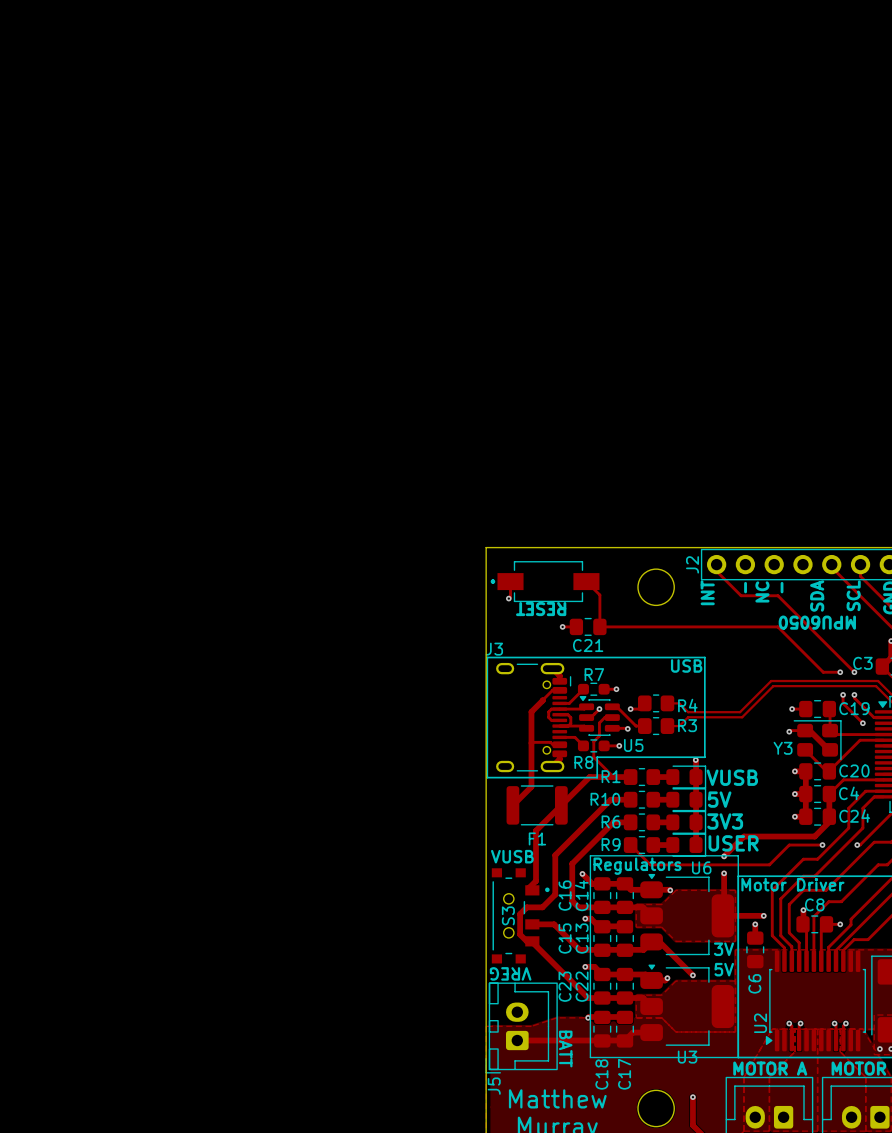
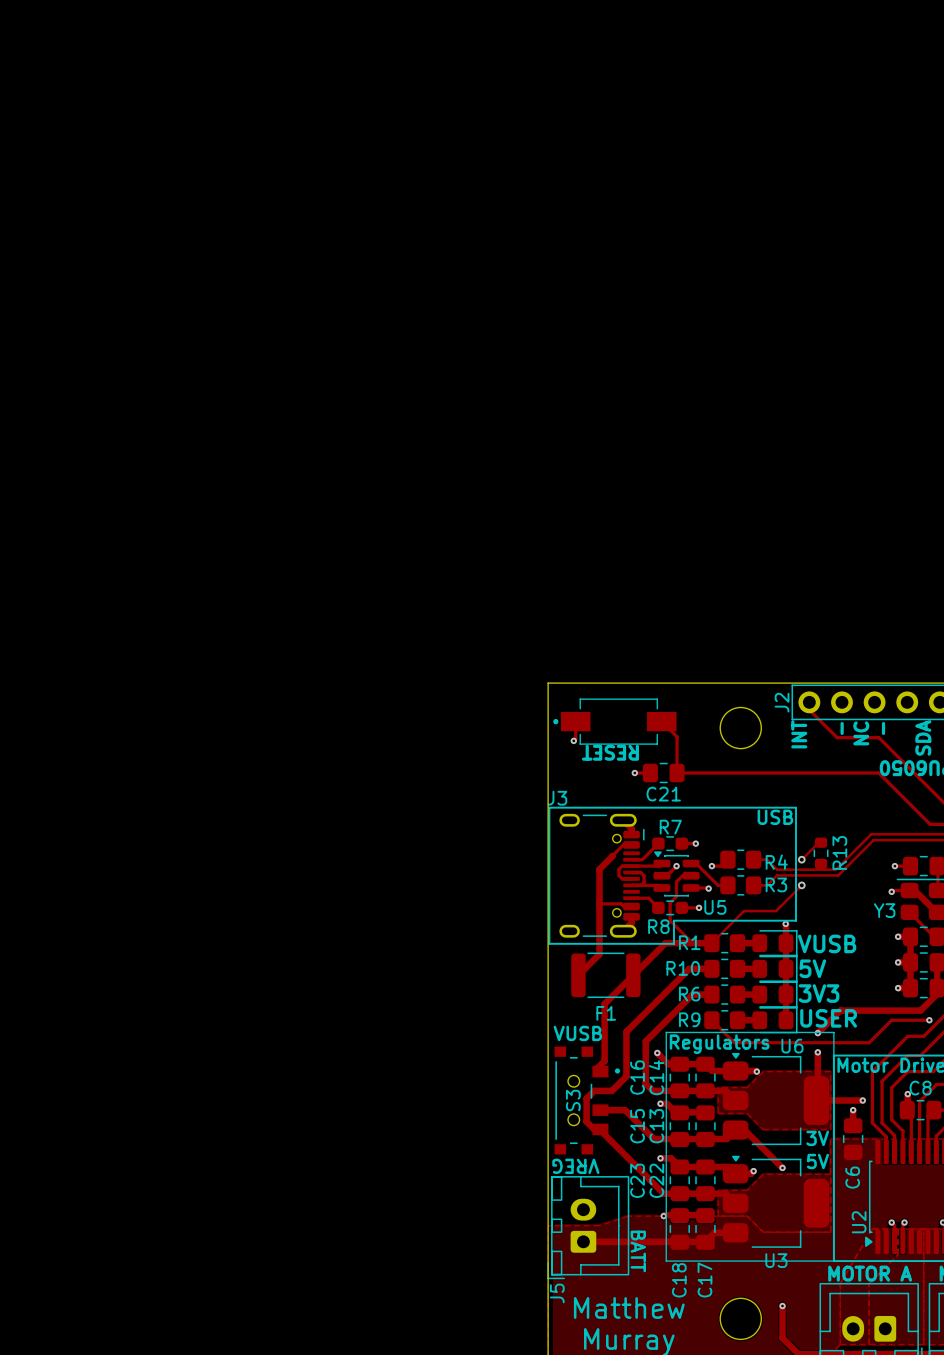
track: none -> (821, 842) (801, 859)
R13: none -> (821, 853)
via: none -> (801, 859)
track: none -> (801, 885) (776, 911) (743, 911) (711, 943)
via: none -> (801, 885)

